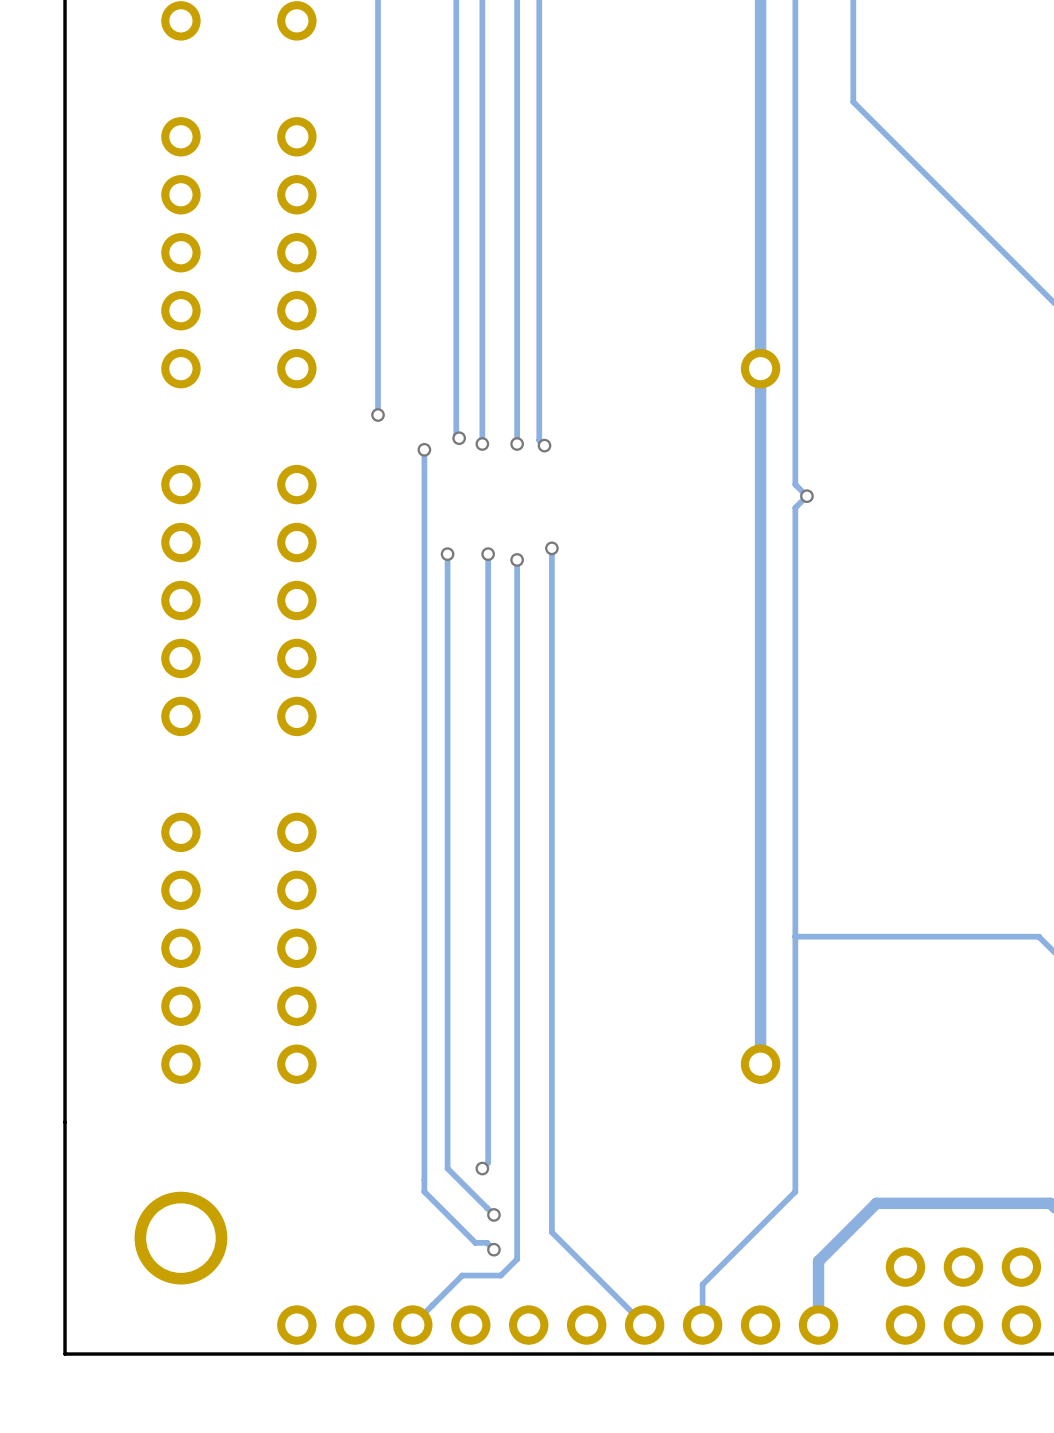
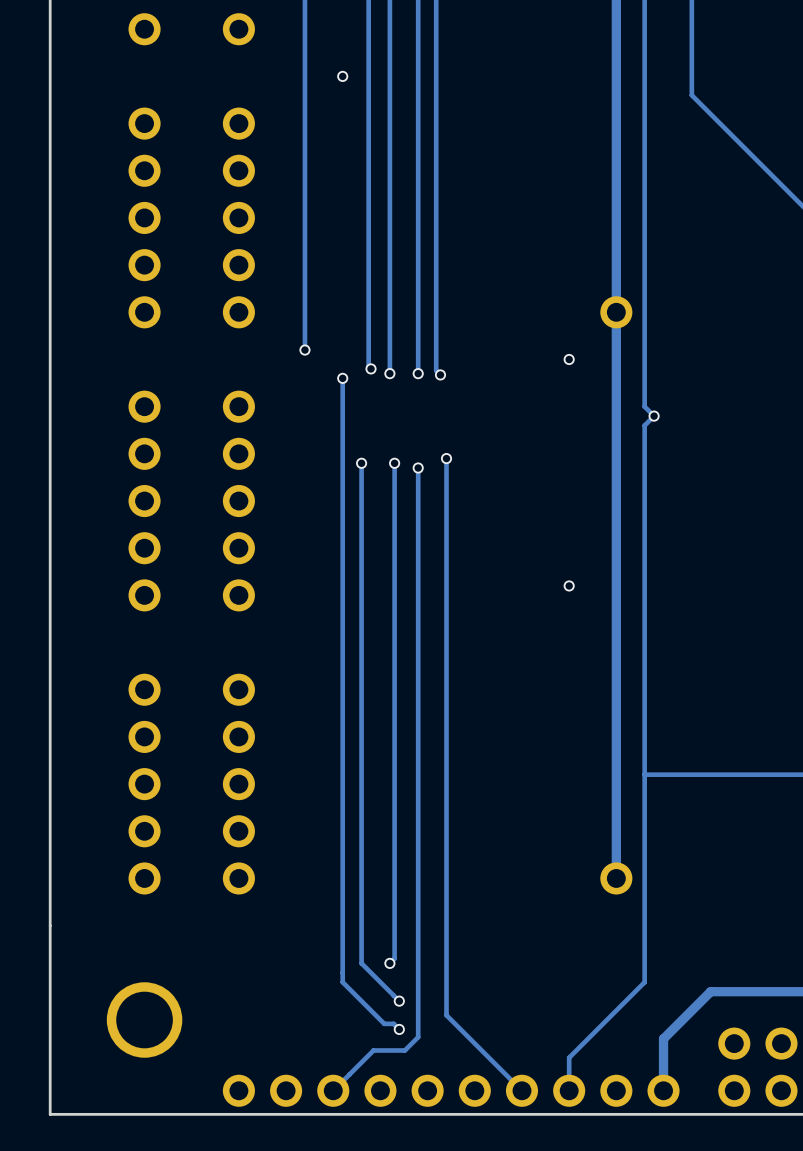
via: none -> (342, 76)
via: none -> (569, 359)
via: none -> (569, 585)

